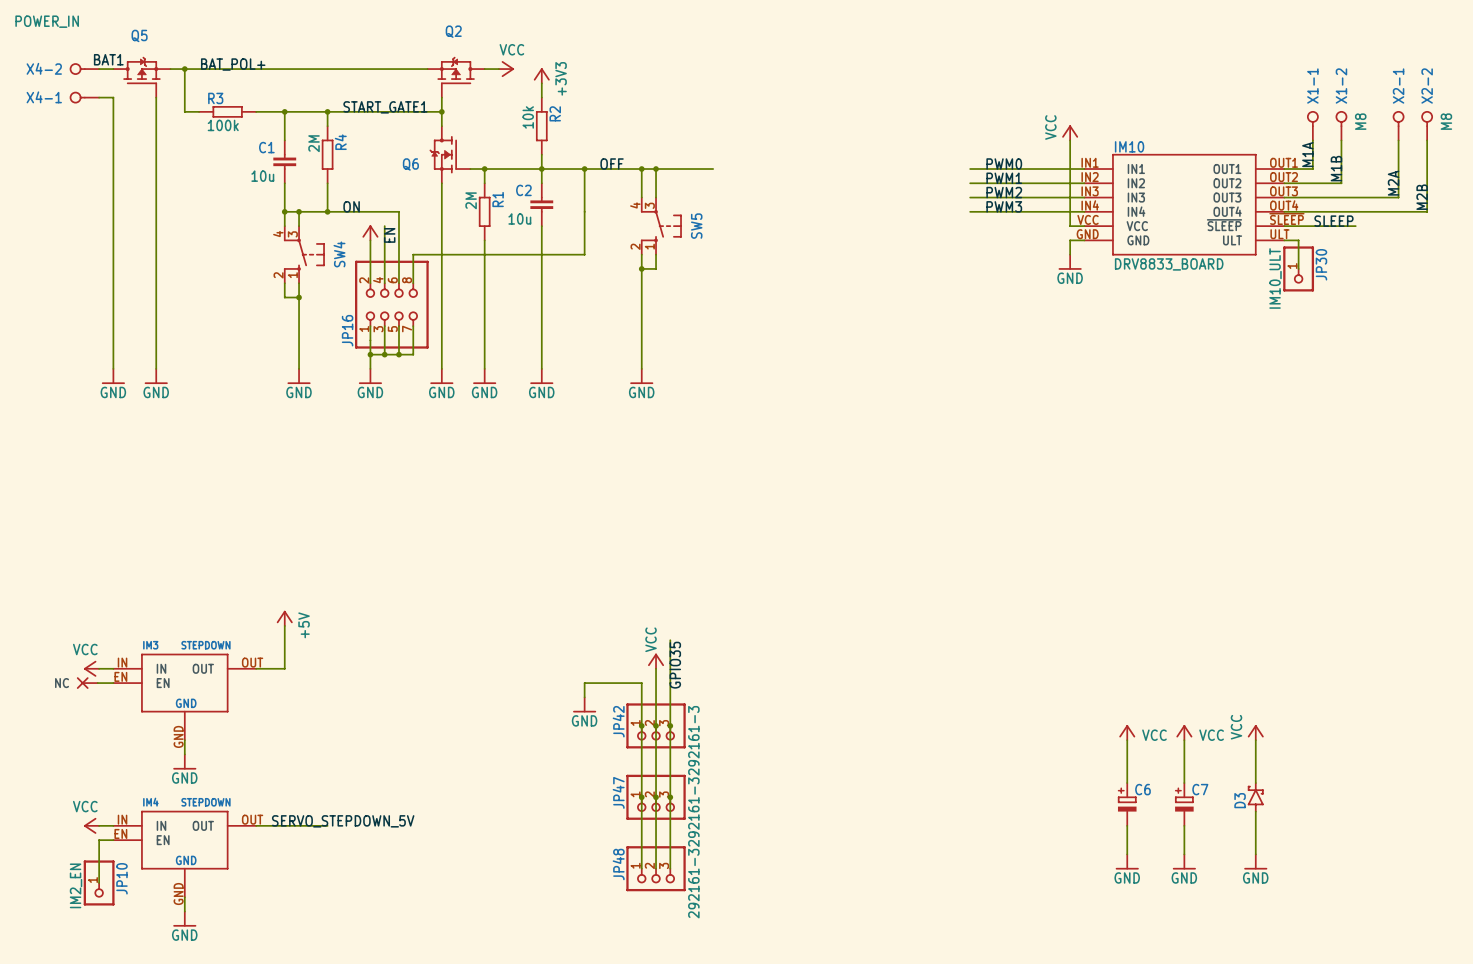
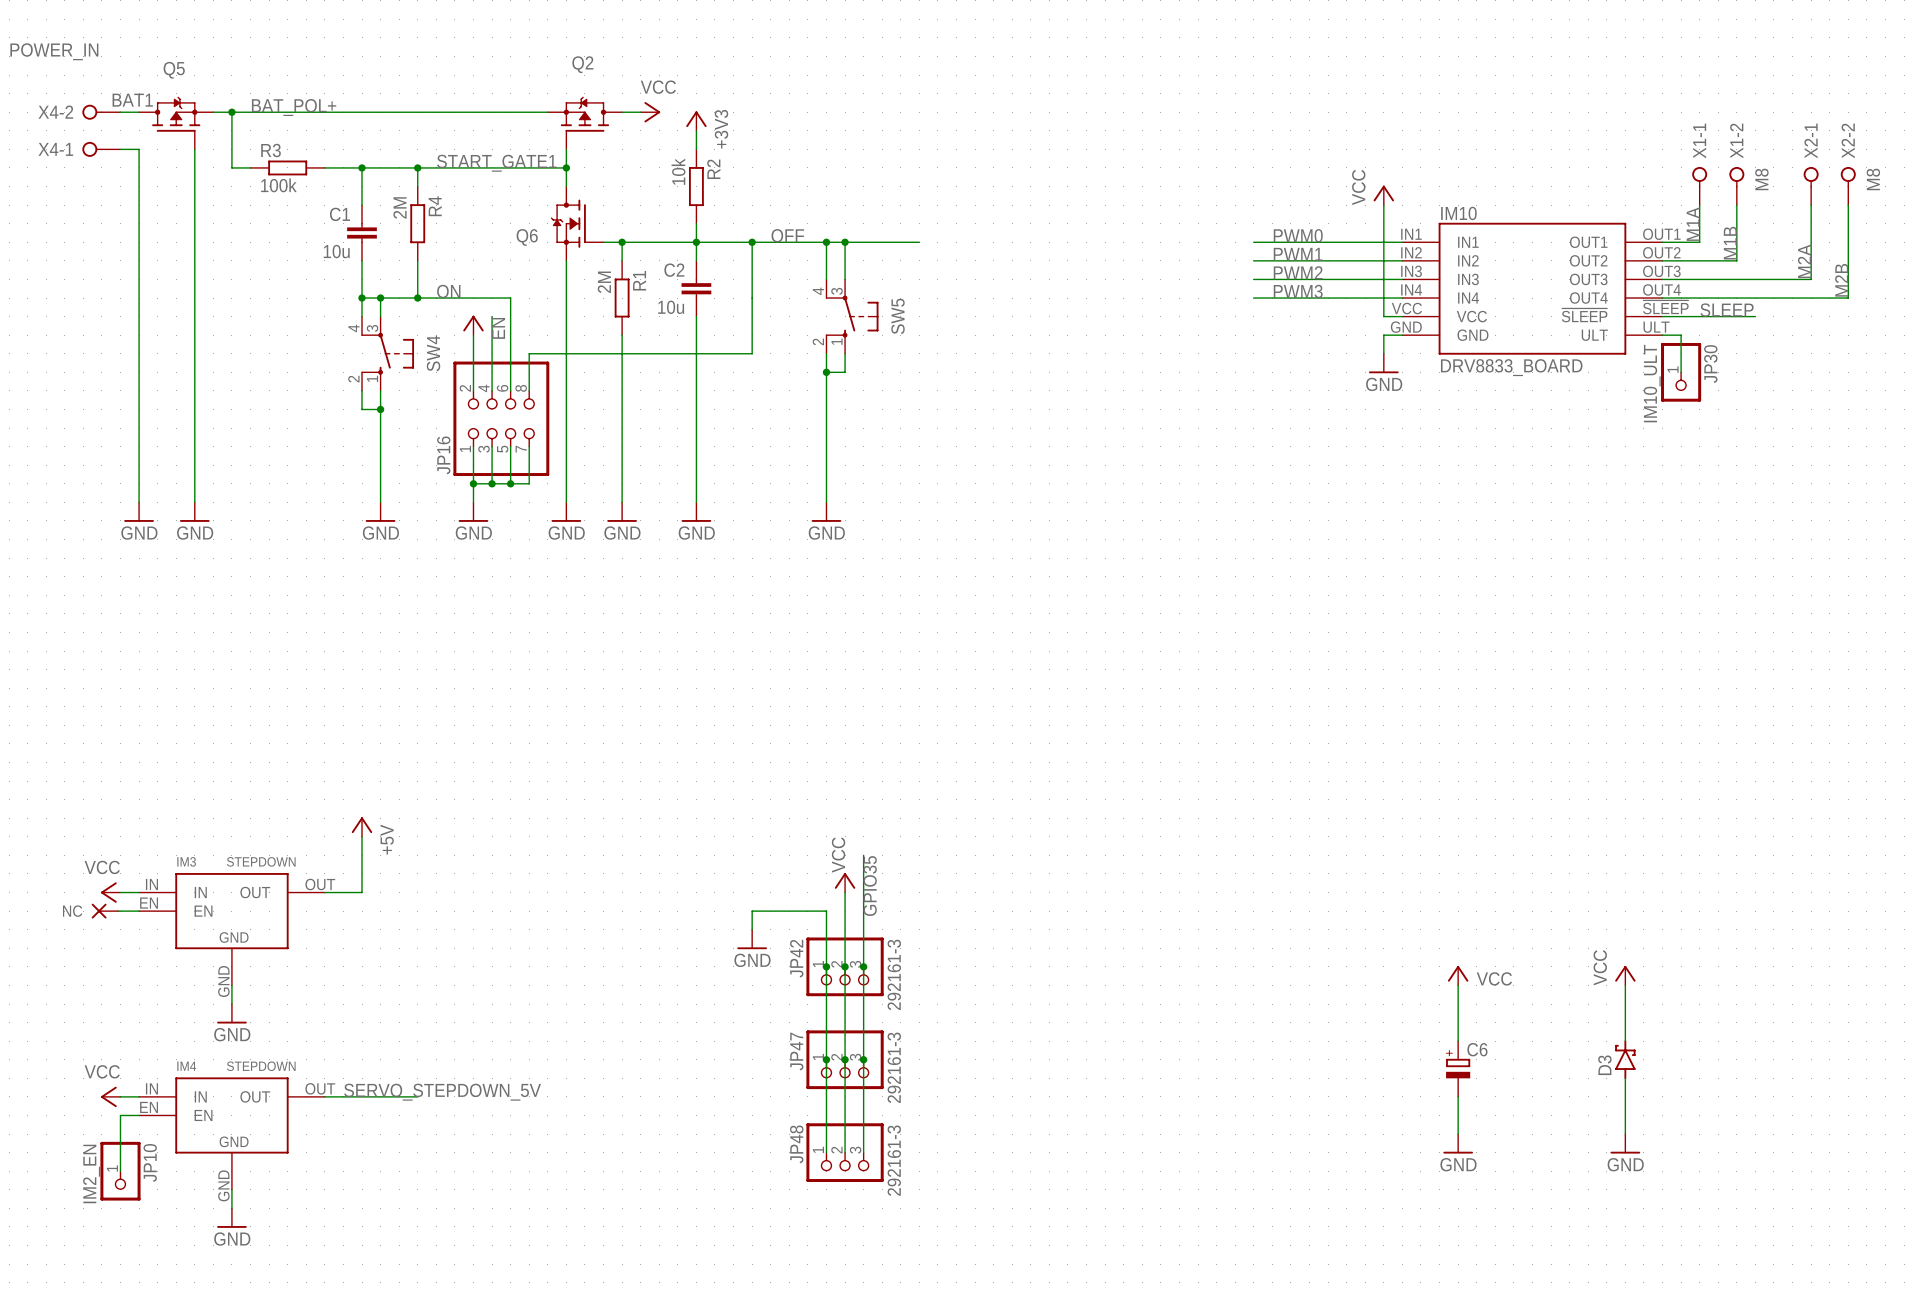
power symbol: VCC (1184, 732) -> none
wire: (1184, 740) (1184, 783) -> none
C7: (1184, 804) -> none
wire: (1184, 825) (1184, 854) -> none
power symbol: GND (1184, 861) -> none

